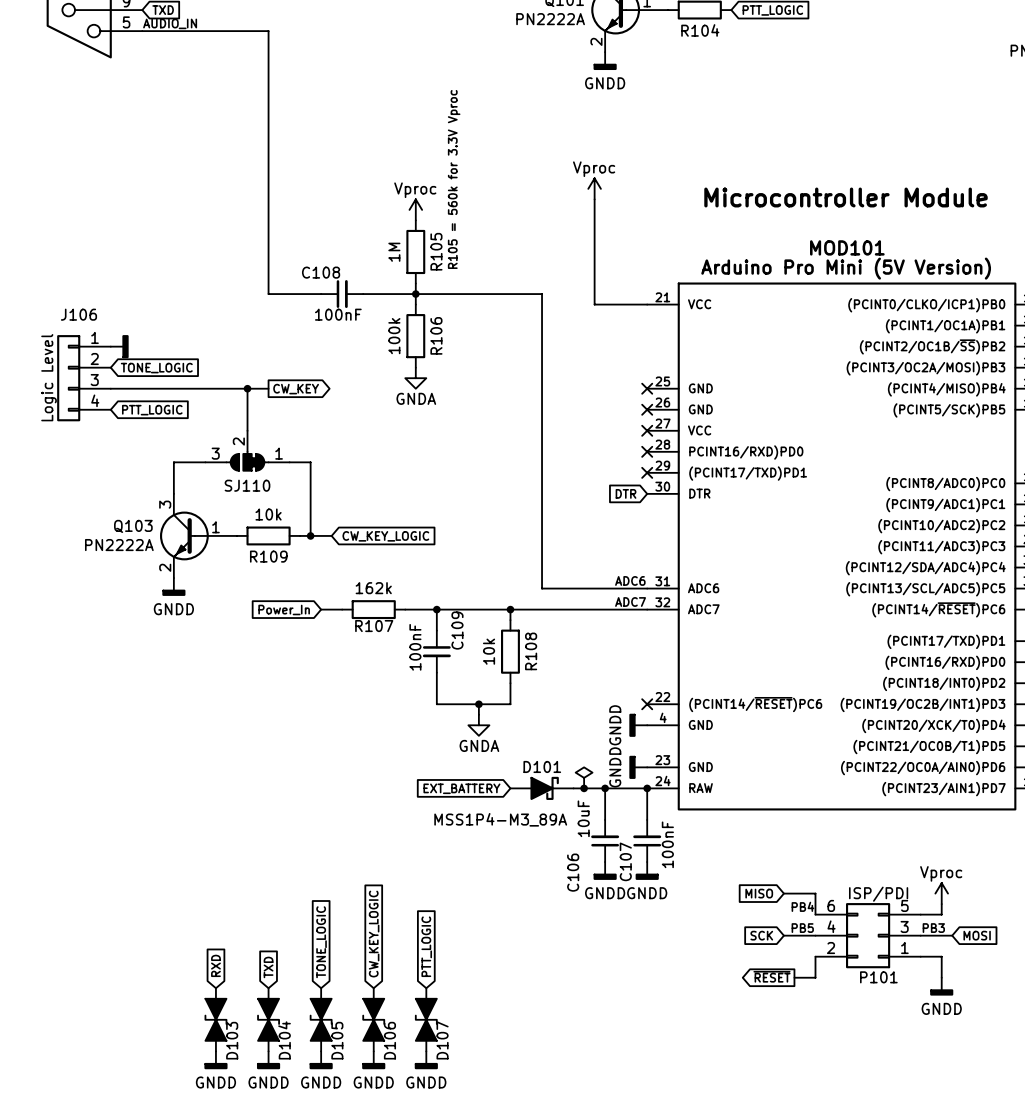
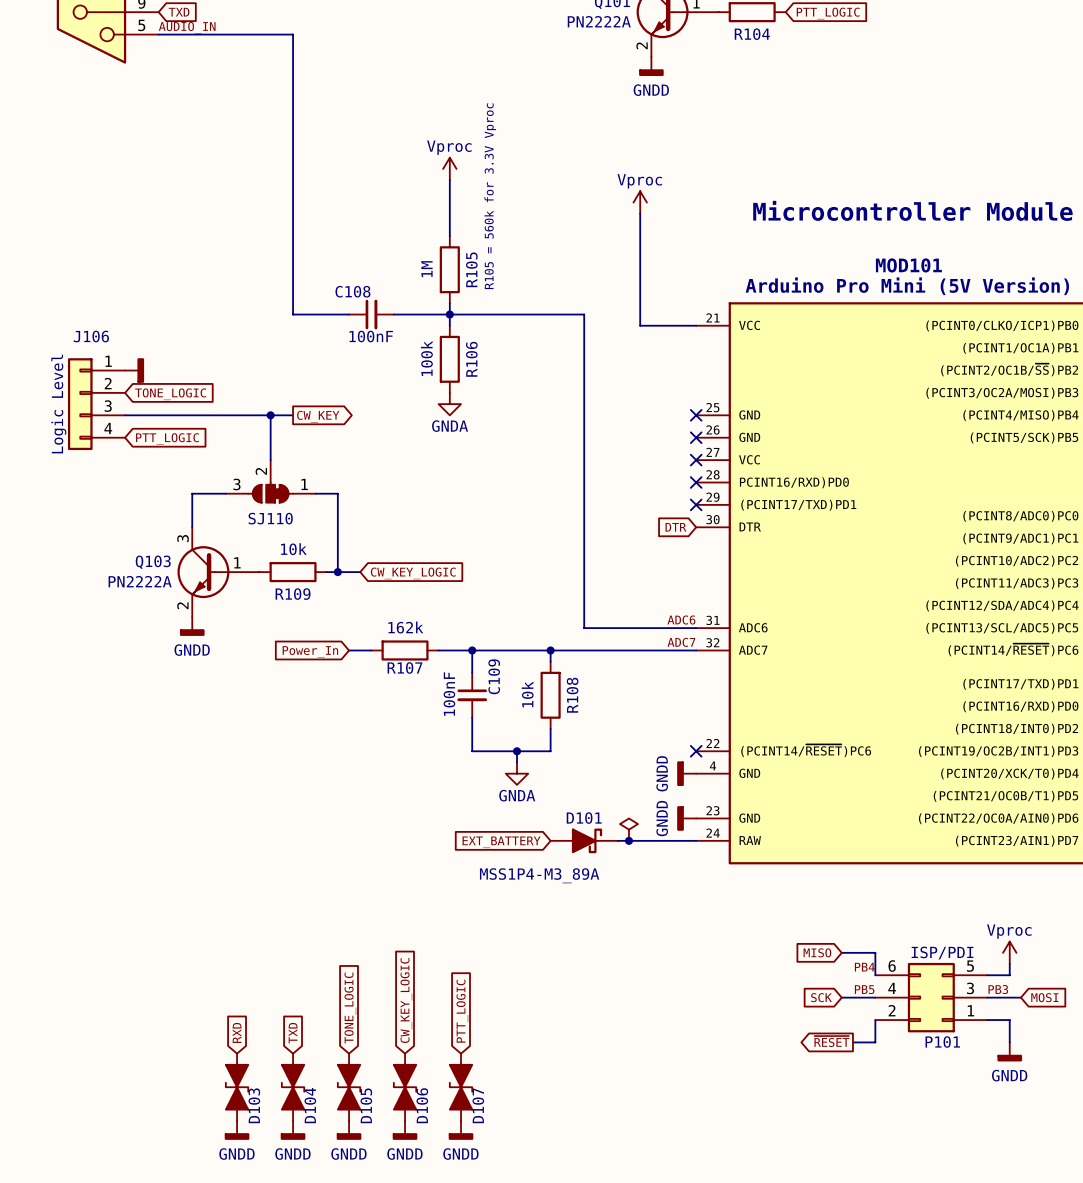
wire: none -> (449, 180) (449, 236)
power symbol position: Vproc (415, 209) -> Vproc (449, 168)
wire: (605, 788) (605, 819) -> none
junction: (605, 788) -> none
wire: (647, 788) (647, 819) -> none
junction: (647, 788) -> none
C106: 10uF (605, 840) -> none
C107: 100nF (647, 840) -> none
power symbol: GNDD (605, 870) -> none
power symbol: GNDD (647, 870) -> none

